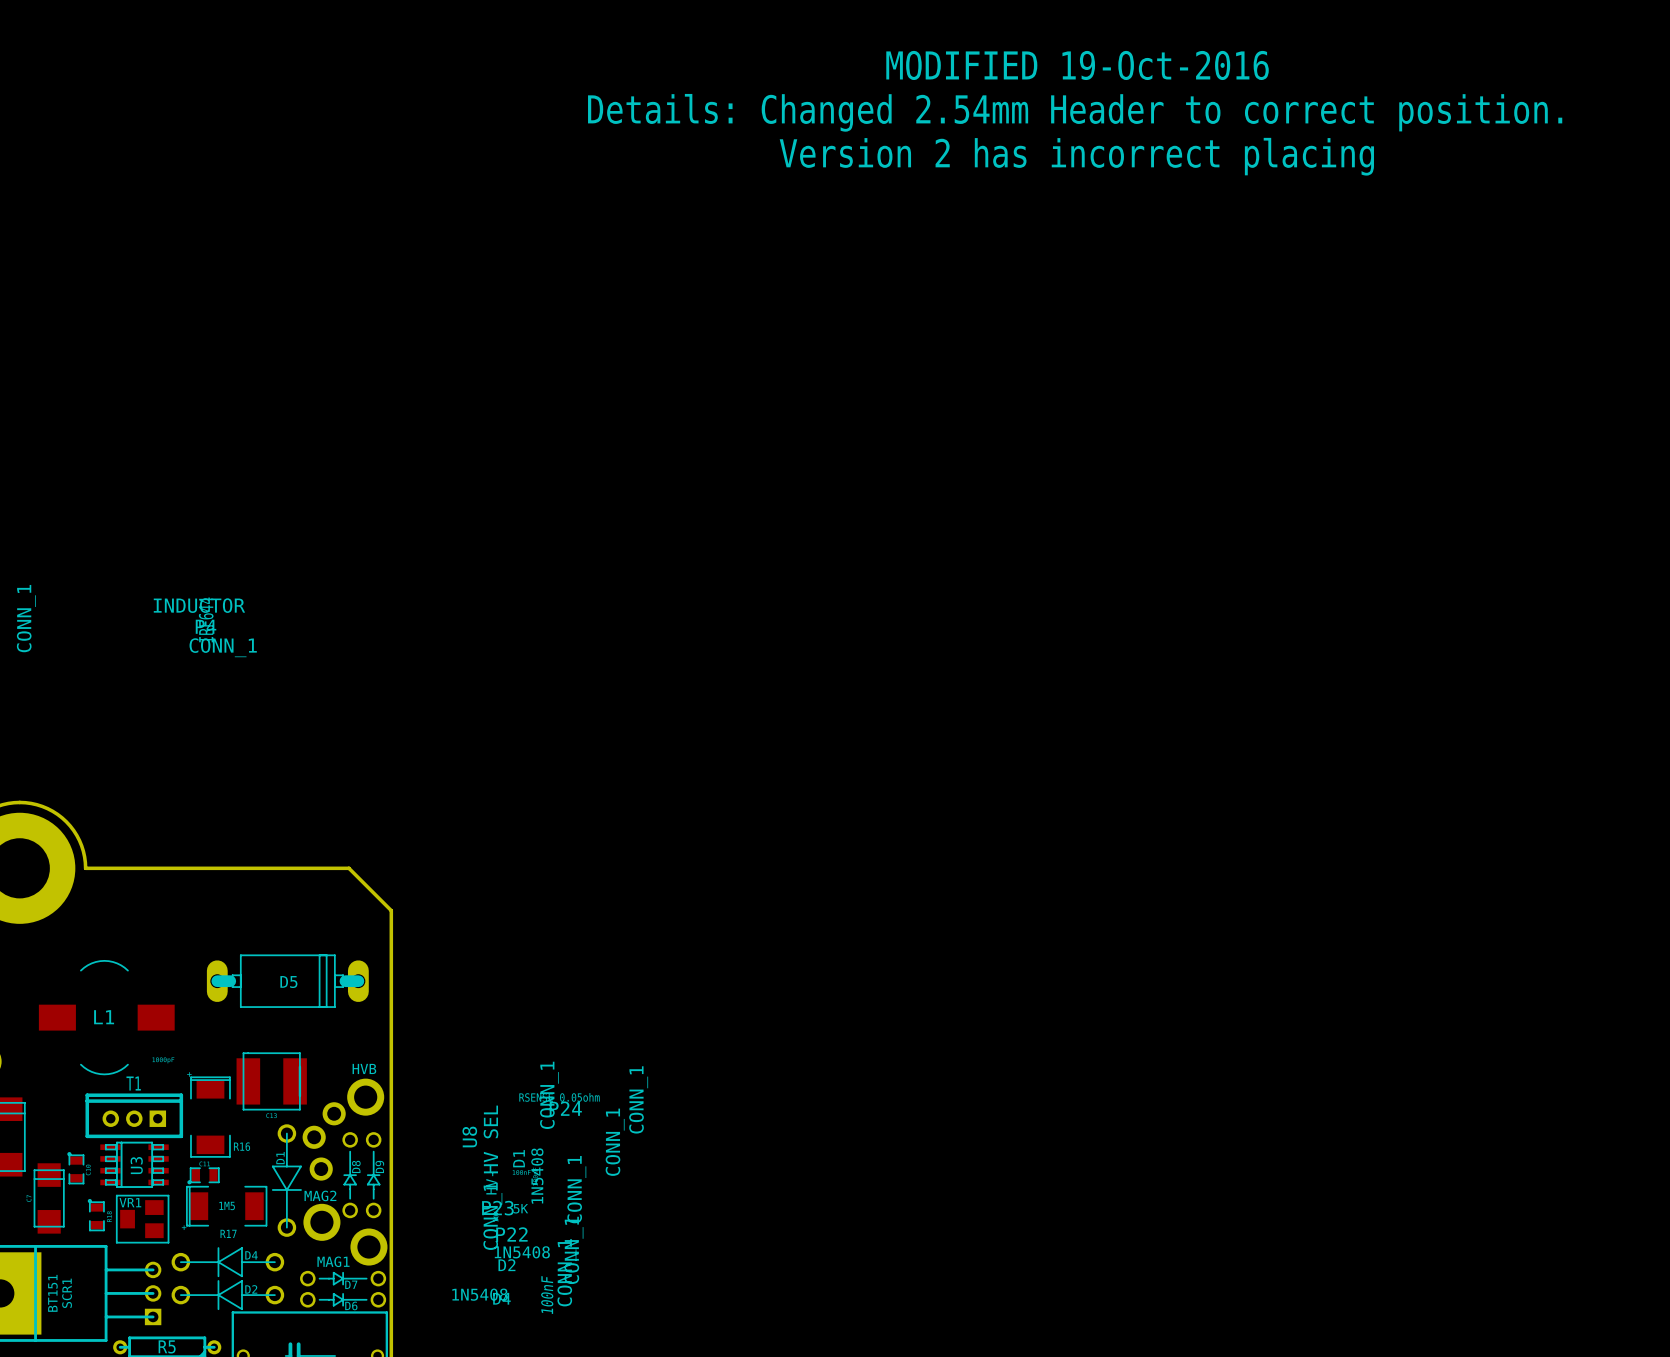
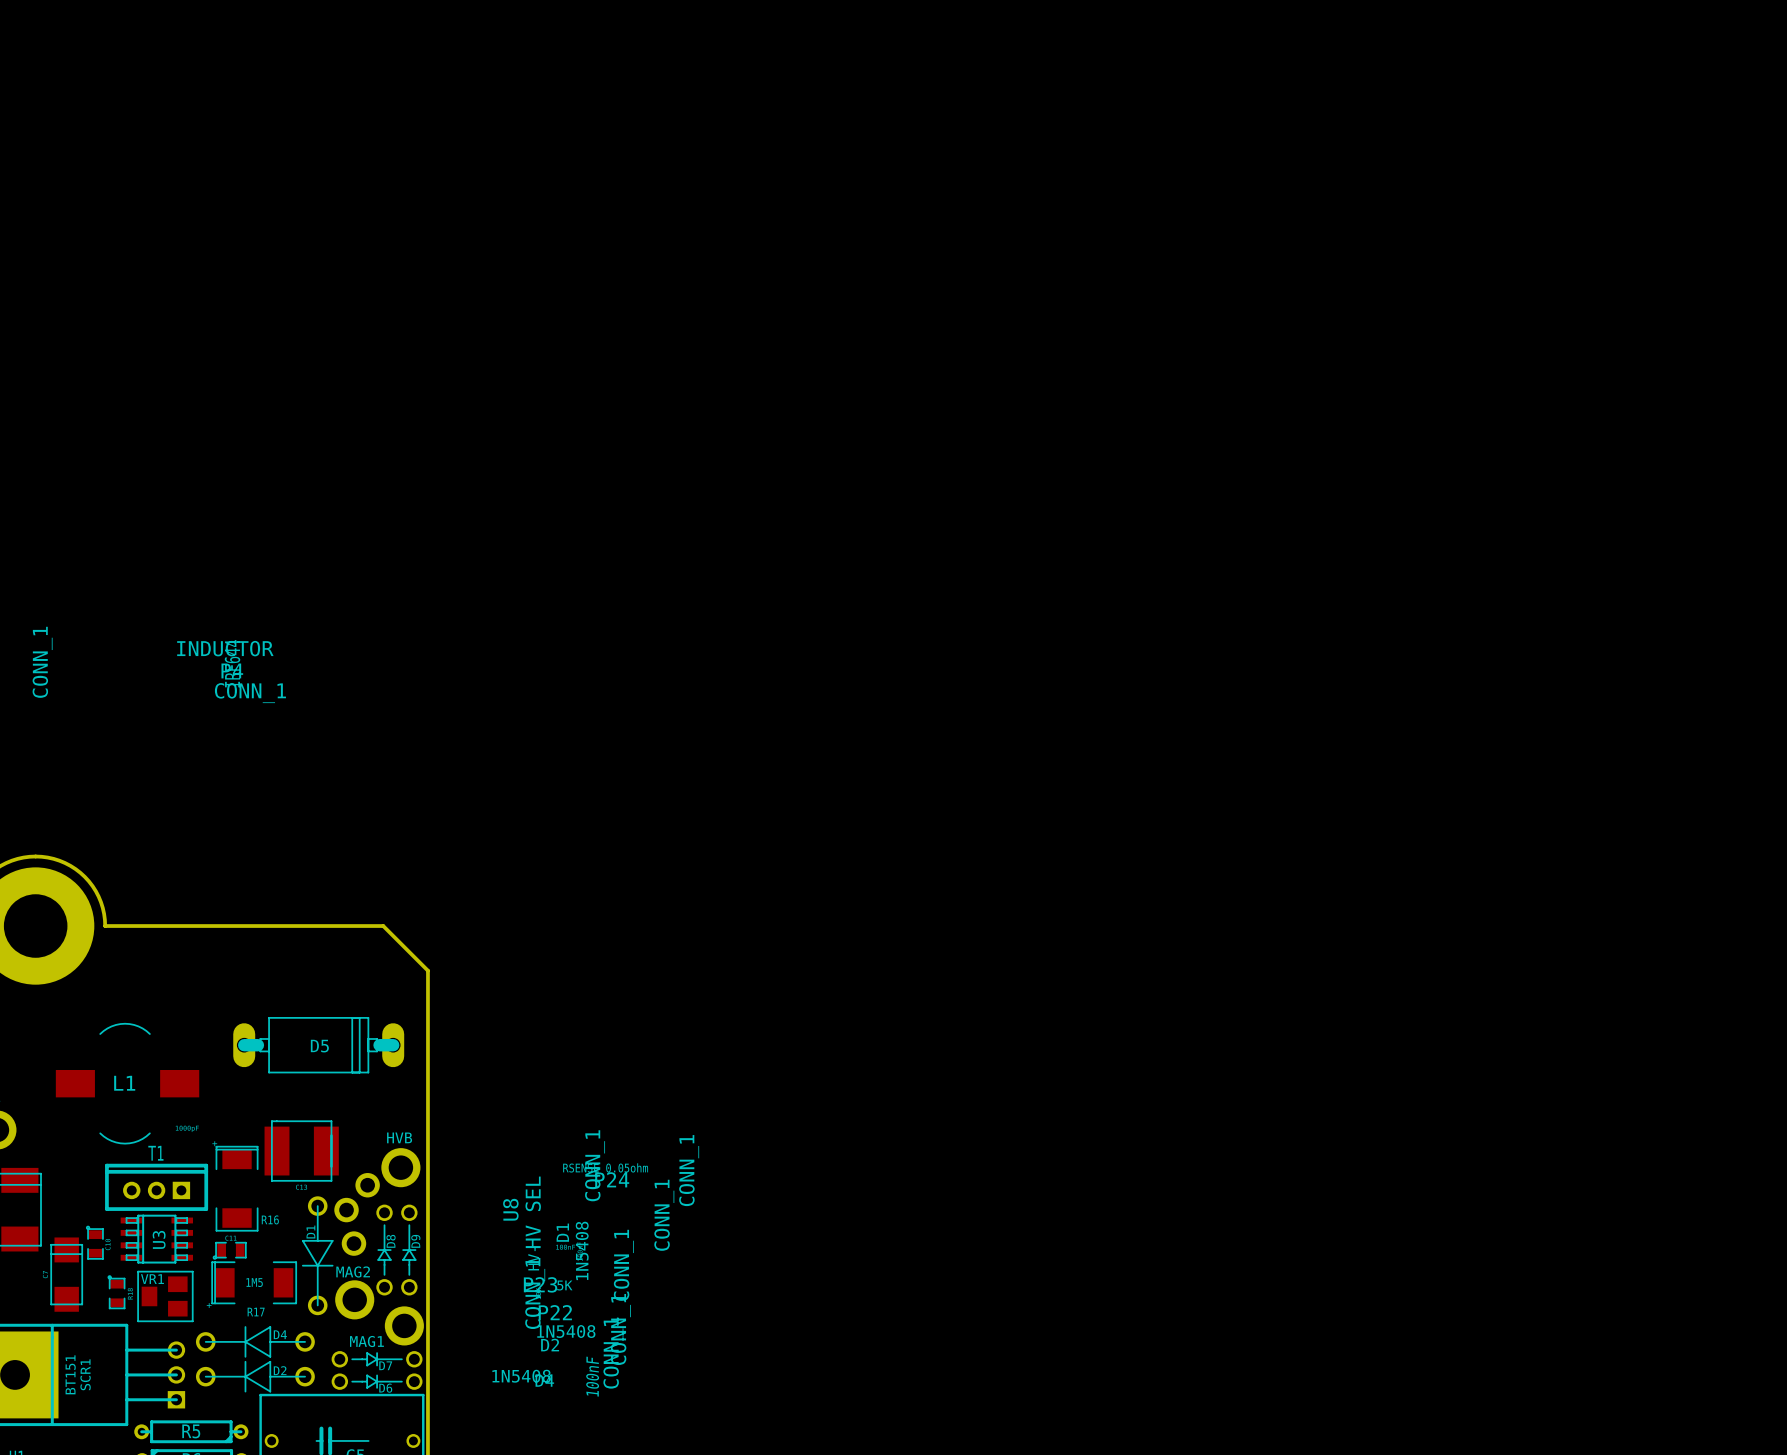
text: MODIFIED 19-Oct-2016 (1077, 65) -> none
text: Details: Changed 2.54mm Header to correct position. (1075, 112) -> none
text: Version 2 has incorrect placing (1076, 156) -> none

